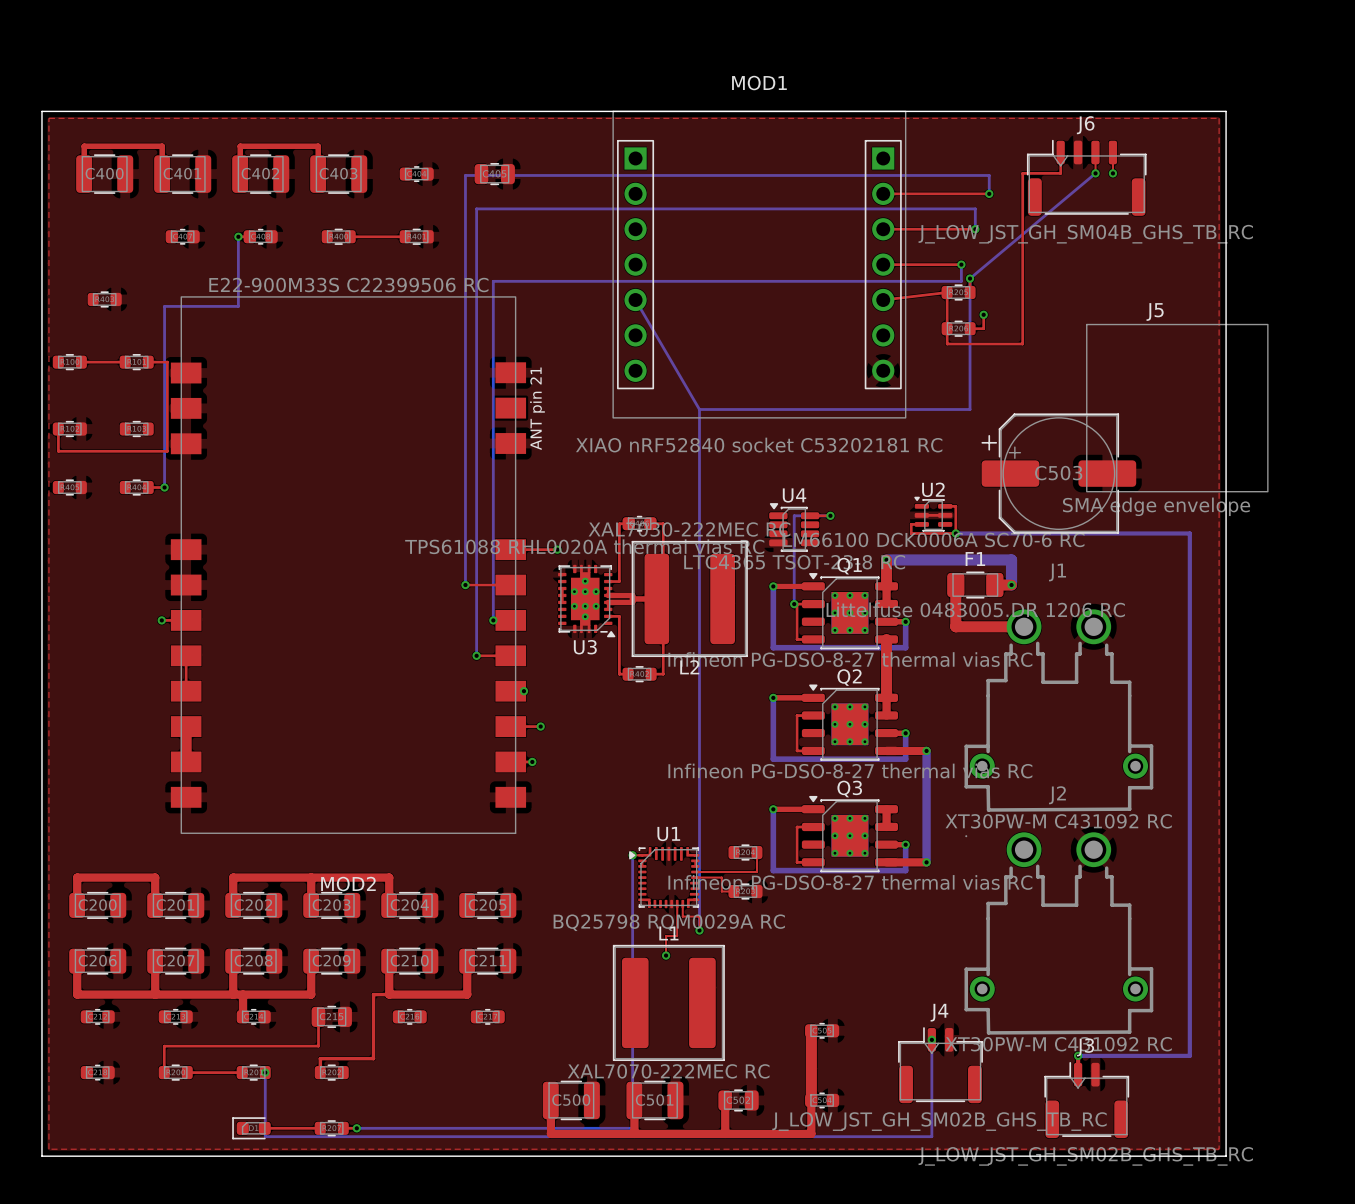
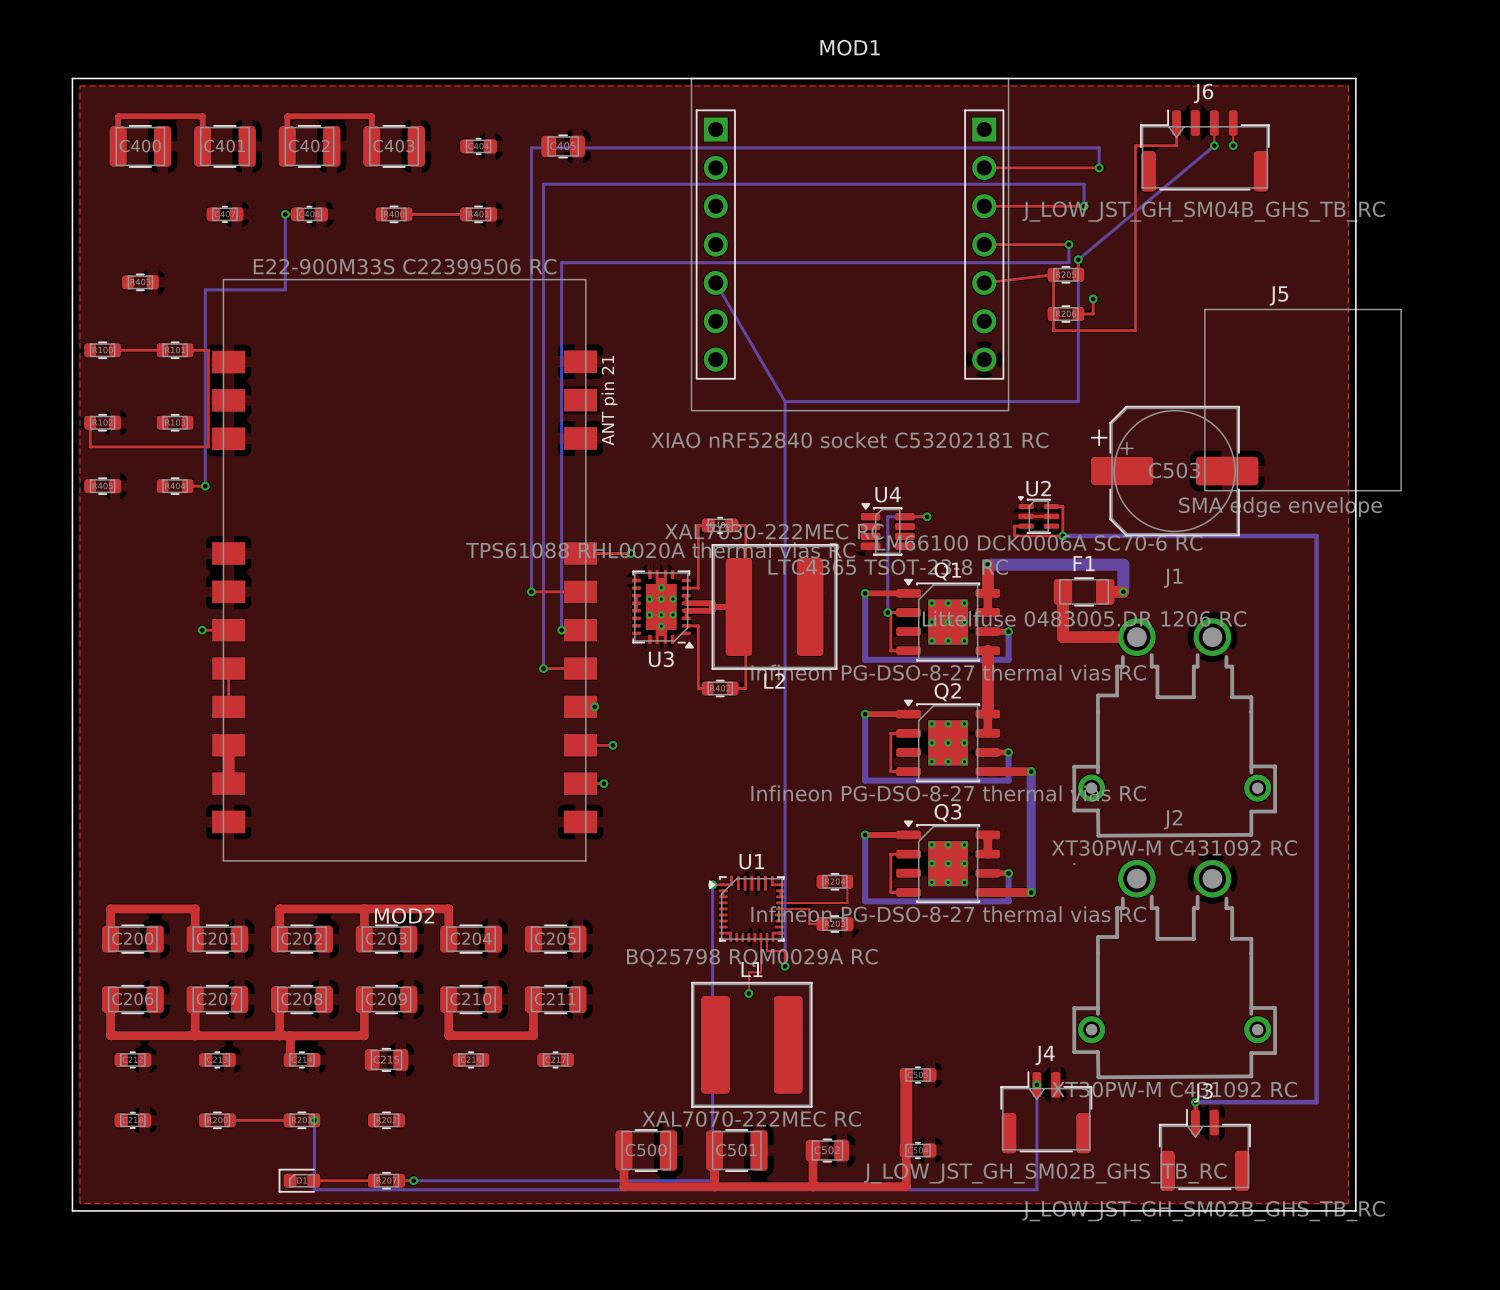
top track: (389, 994) (373, 994) (373, 1058) (320, 1058) (320, 1072) -> none
top track: (318, 1016) (318, 1046) (164, 1046) (164, 1072) -> none

